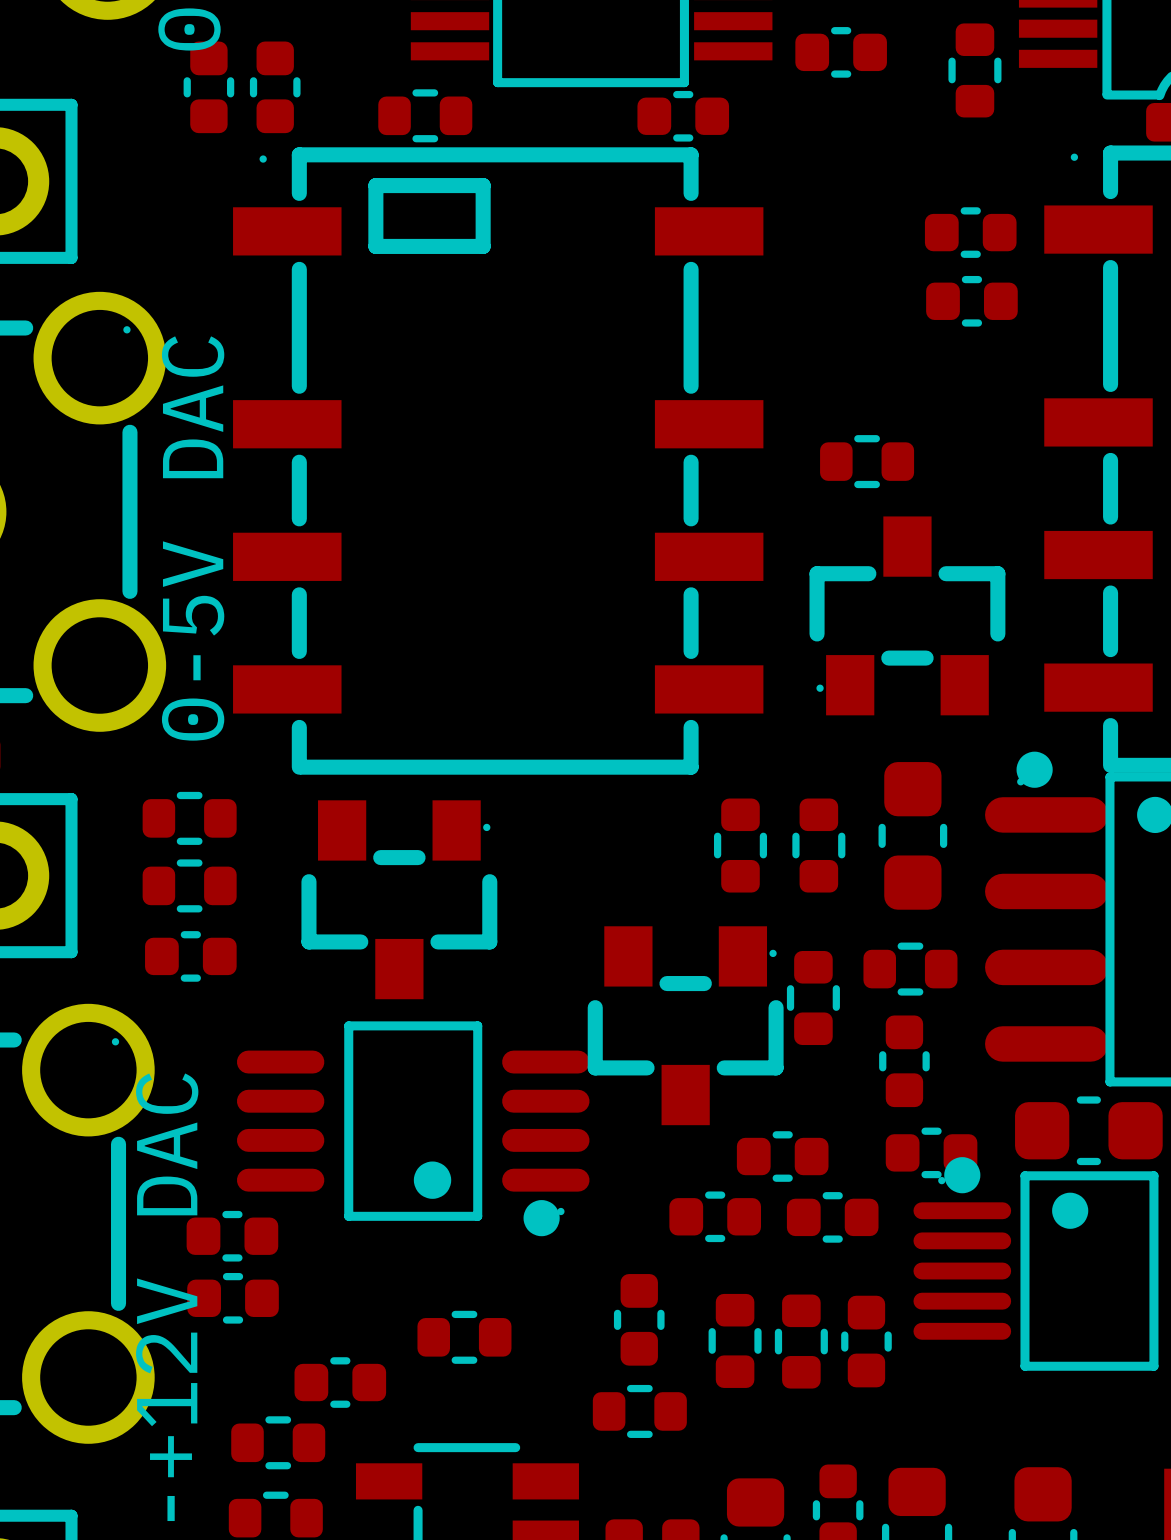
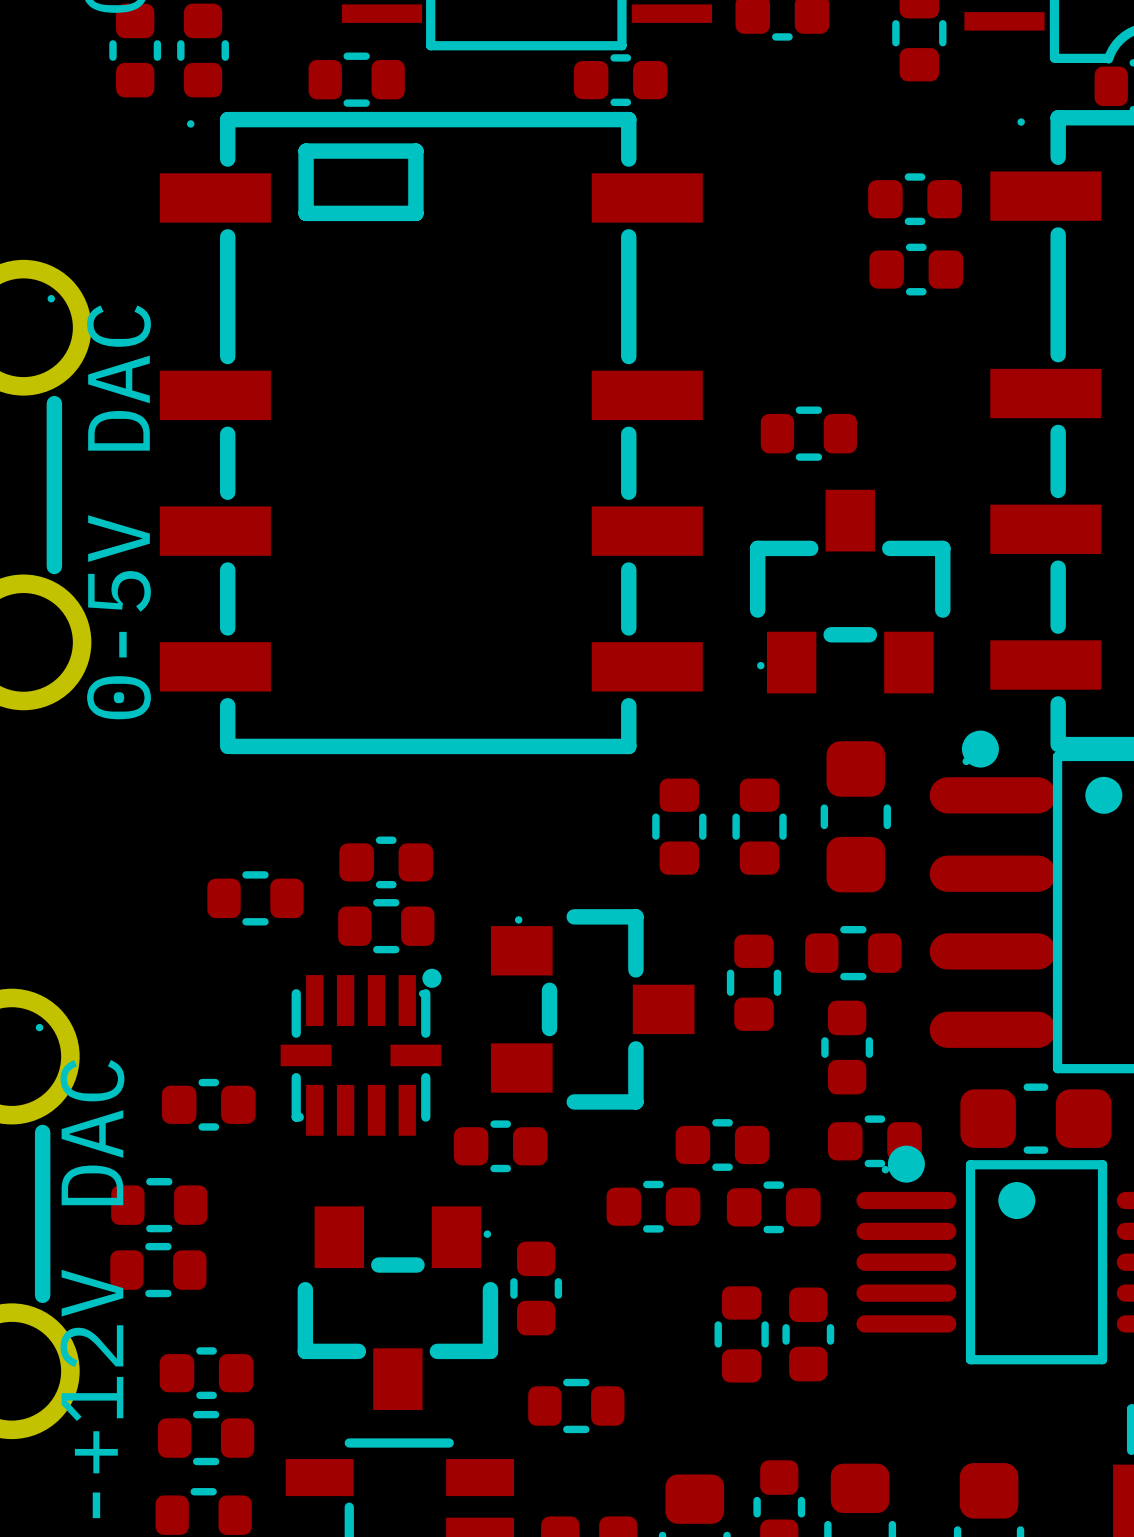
part: (189, 818) -> none
part: none -> (386, 862)
part: (189, 885) -> none
part: (399, 899) -> none
part: none -> (255, 898)
part: none -> (386, 926)
part: (190, 956) -> none
part rotation: 0° (685, 1025) -> 90° counterclockwise (592, 1009)
part: none -> (361, 1052)
part: none -> (208, 1104)
part: (413, 1128) -> none
part: none -> (500, 1146)
part: none -> (159, 1205)
part: (232, 1236) -> none
part footprint: [187, 1272, 279, 1324] -> [110, 1242, 207, 1298]
part footprint: [417, 1310, 512, 1364] -> [297, 1206, 499, 1410]
part position: (639, 1319) -> (536, 1288)
part: (735, 1340) -> none
part position: (340, 1382) -> (206, 1373)

